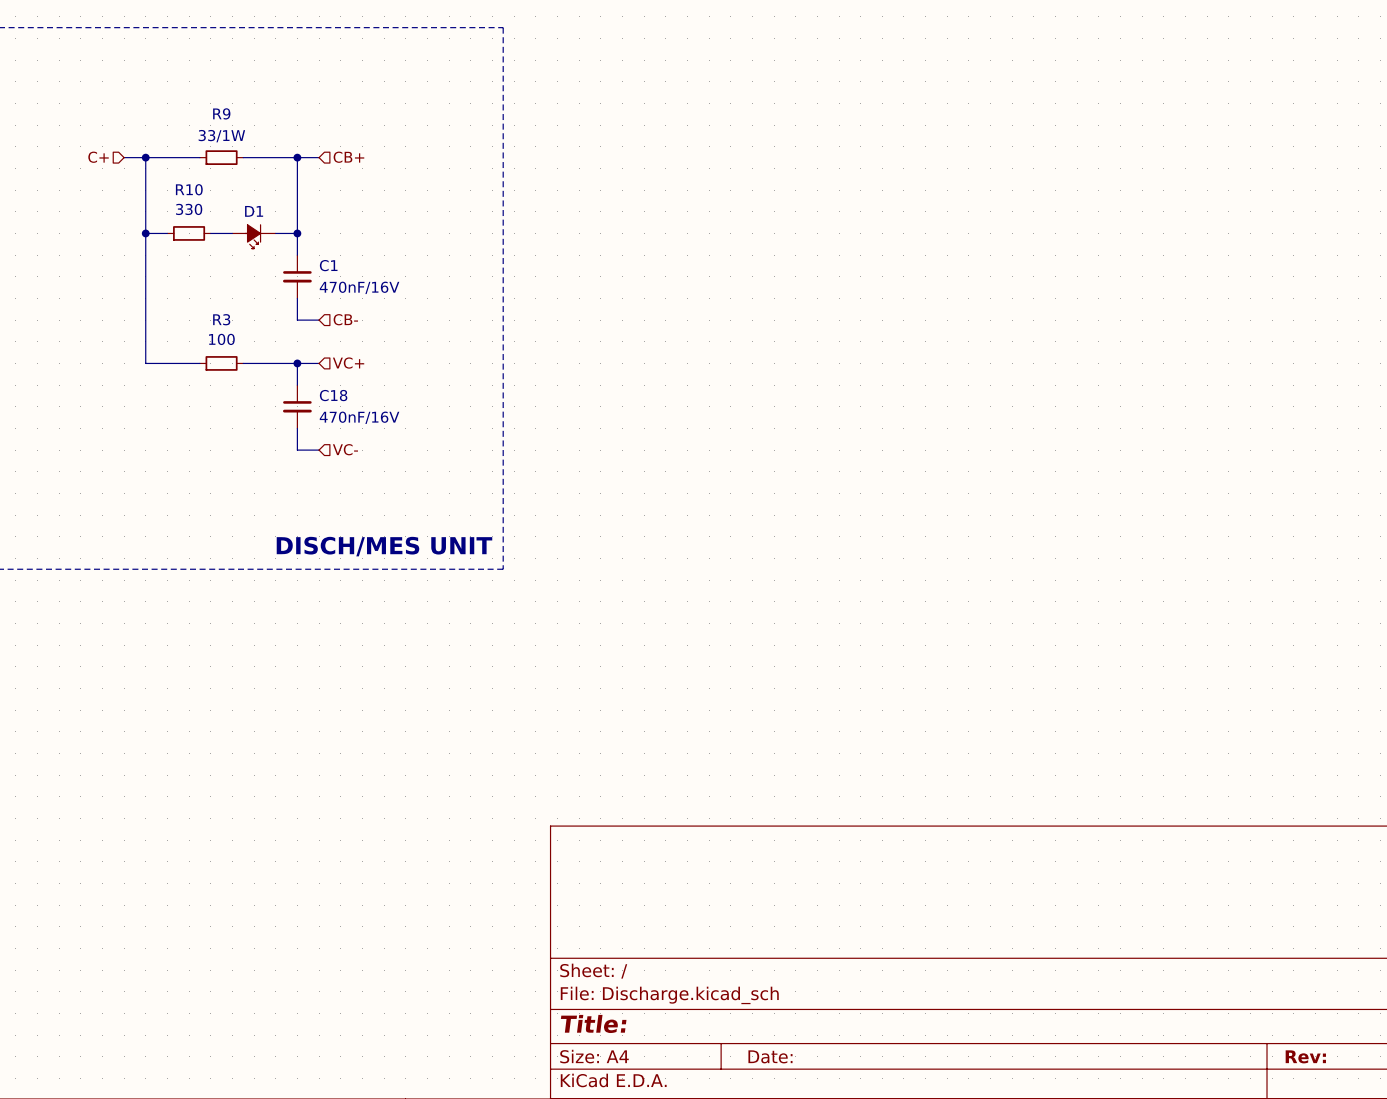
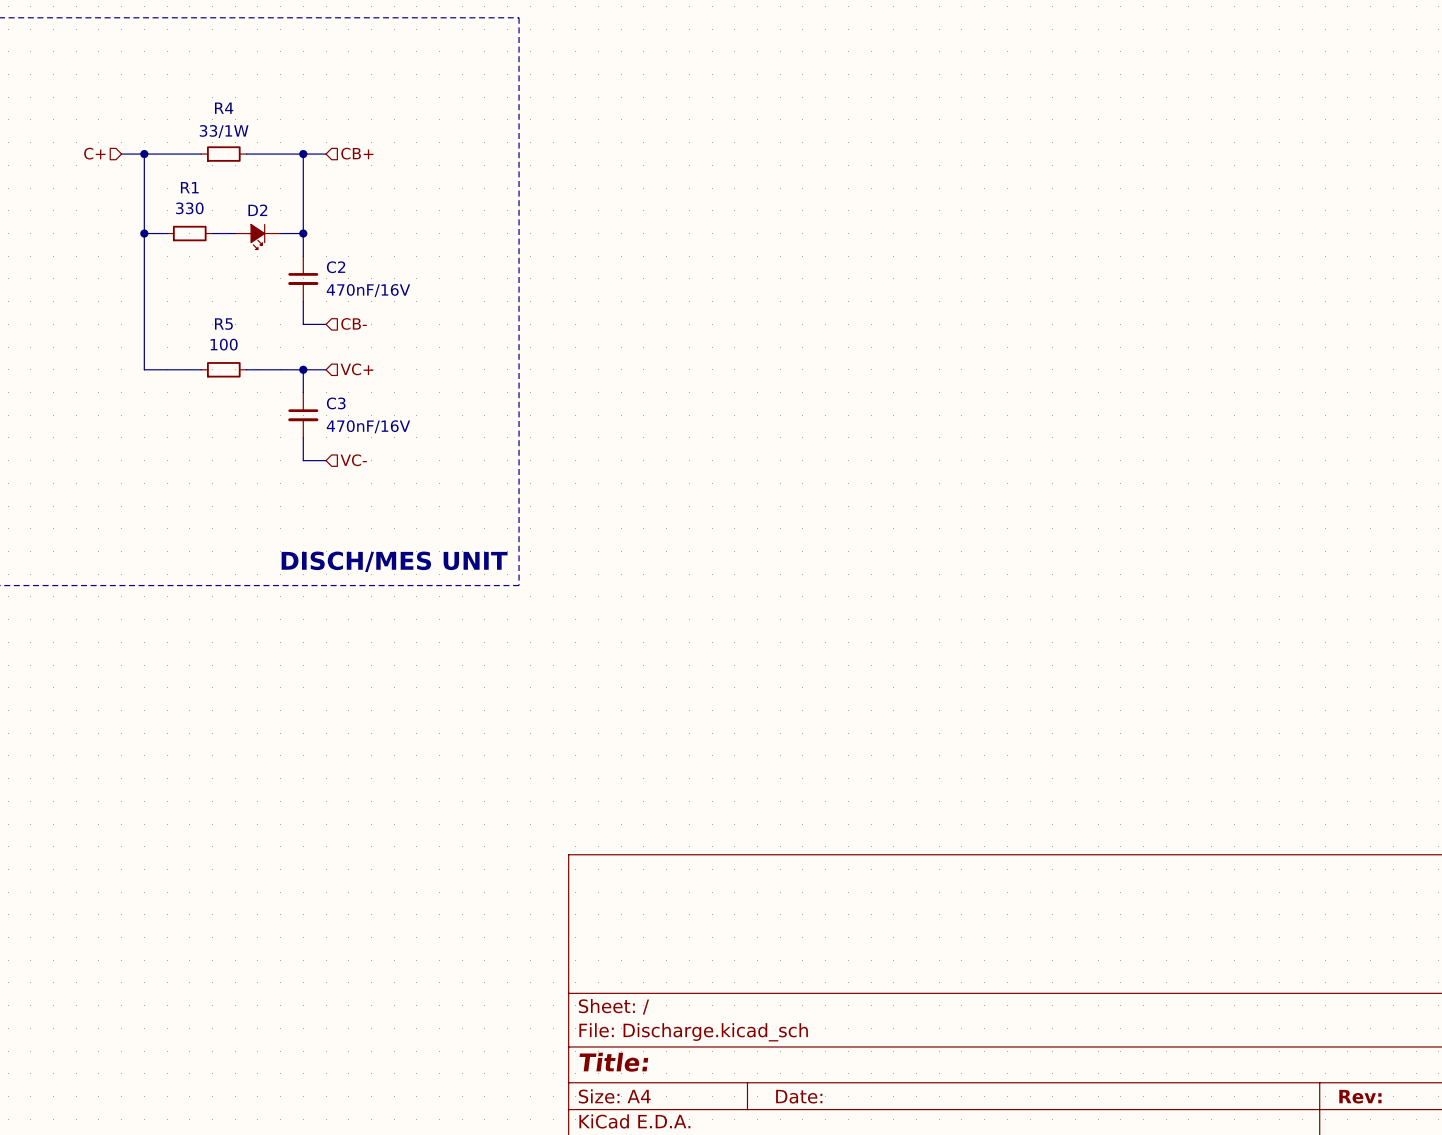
R9 name: R9 (221, 113) -> R4 (224, 108)
R10 name: R10 (189, 189) -> R1 (189, 187)
D1 name: D1 (254, 211) -> D2 (257, 210)
C1 name: C1 (328, 265) -> C2 (336, 267)
R3 name: R3 (221, 319) -> R5 (223, 324)
C18 name: C18 (333, 395) -> C3 (336, 403)

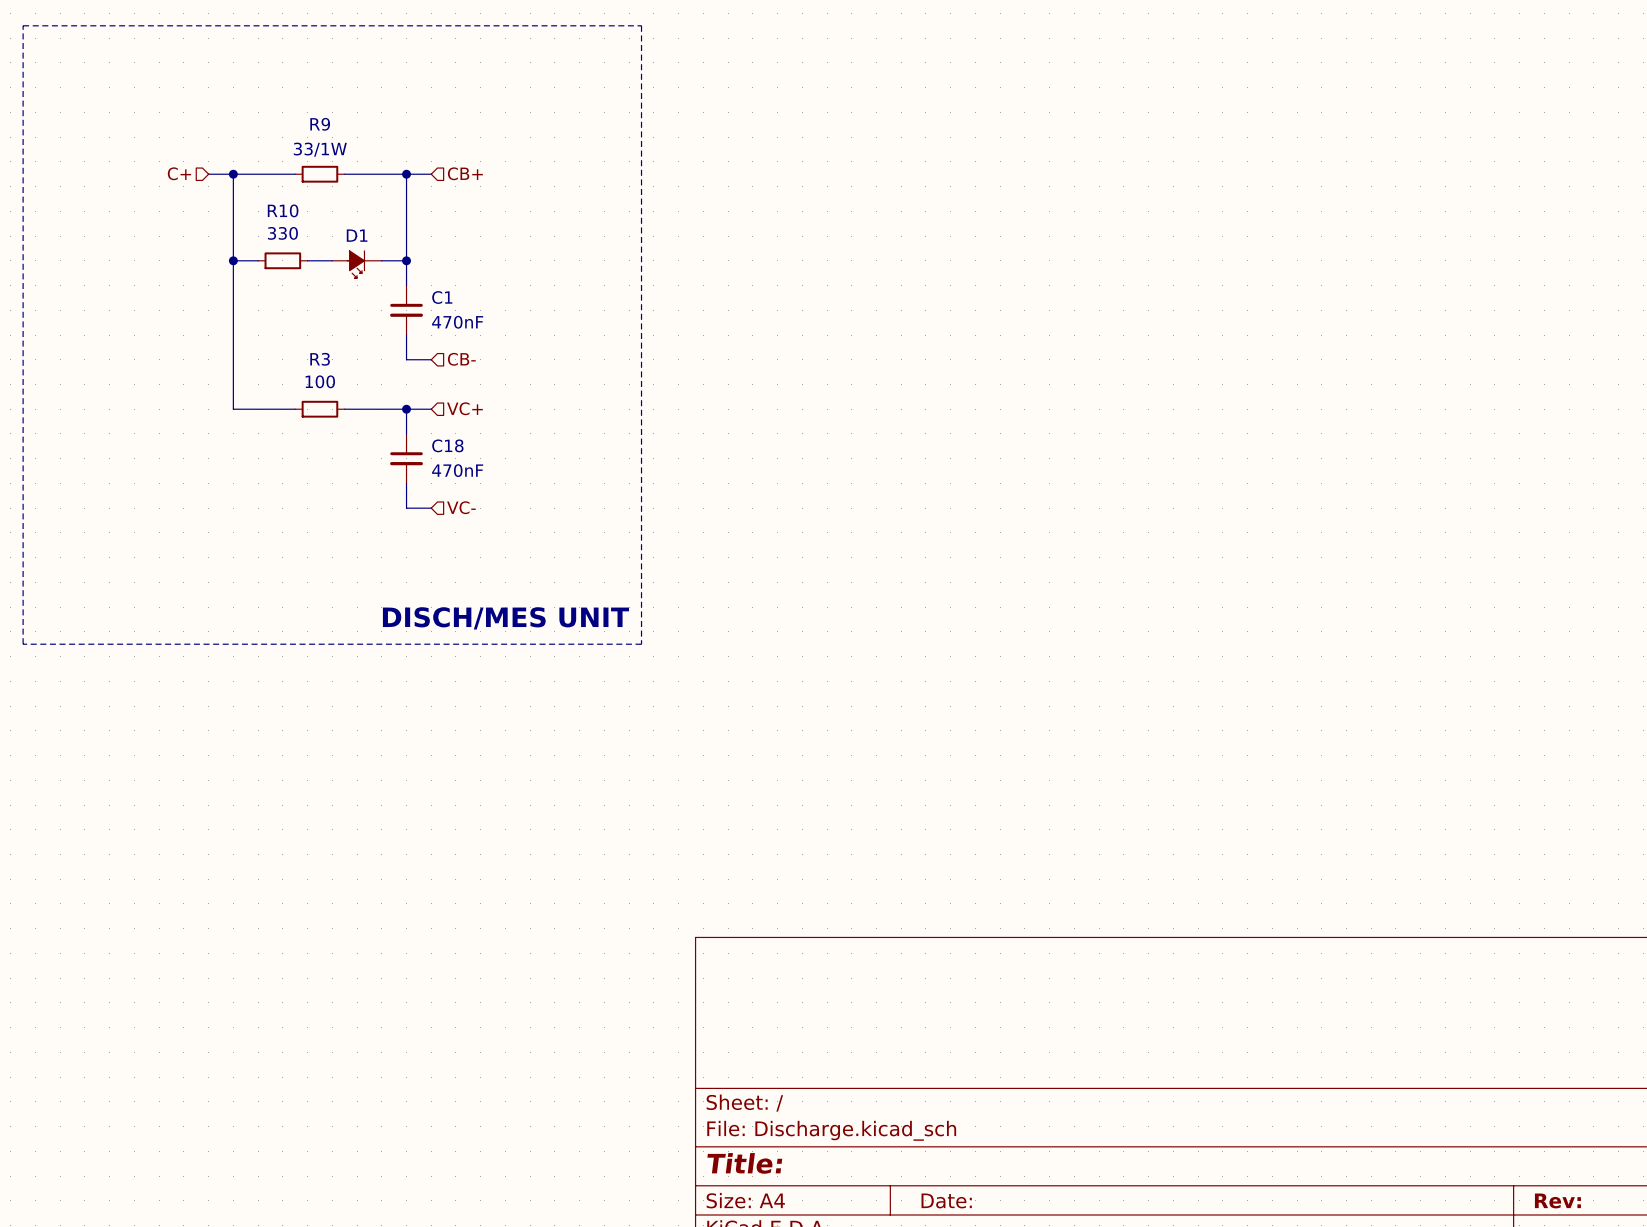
R4 name: R4 (224, 108) -> R9 (320, 124)
R1 name: R1 (189, 187) -> R10 (283, 210)
D2 name: D2 (257, 210) -> D1 (357, 235)
C2 name: C2 (336, 267) -> C1 (442, 297)
C2 value: 470nF/16V (368, 290) -> 470nF (457, 322)
R5 name: R5 (223, 324) -> R3 (320, 359)
C3 name: C3 (336, 403) -> C18 (447, 445)
C3 value: 470nF/16V (368, 426) -> 470nF (457, 470)

